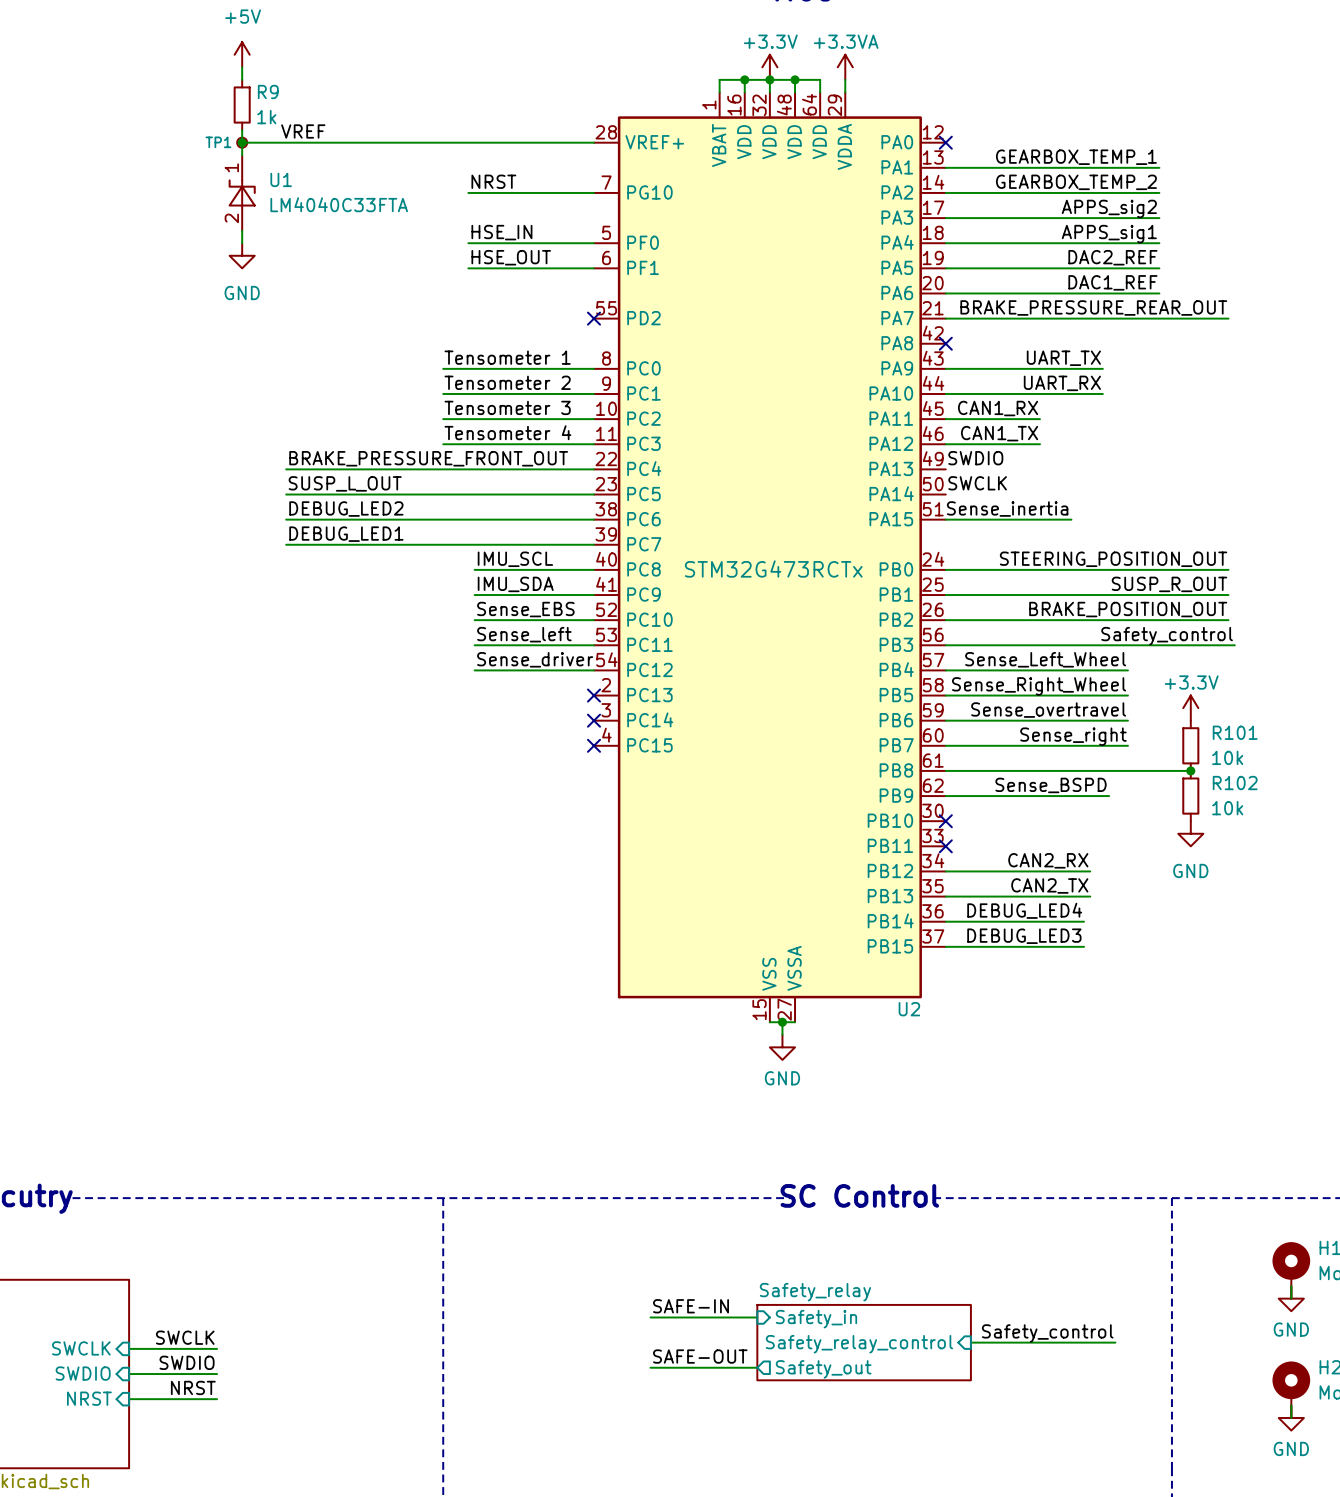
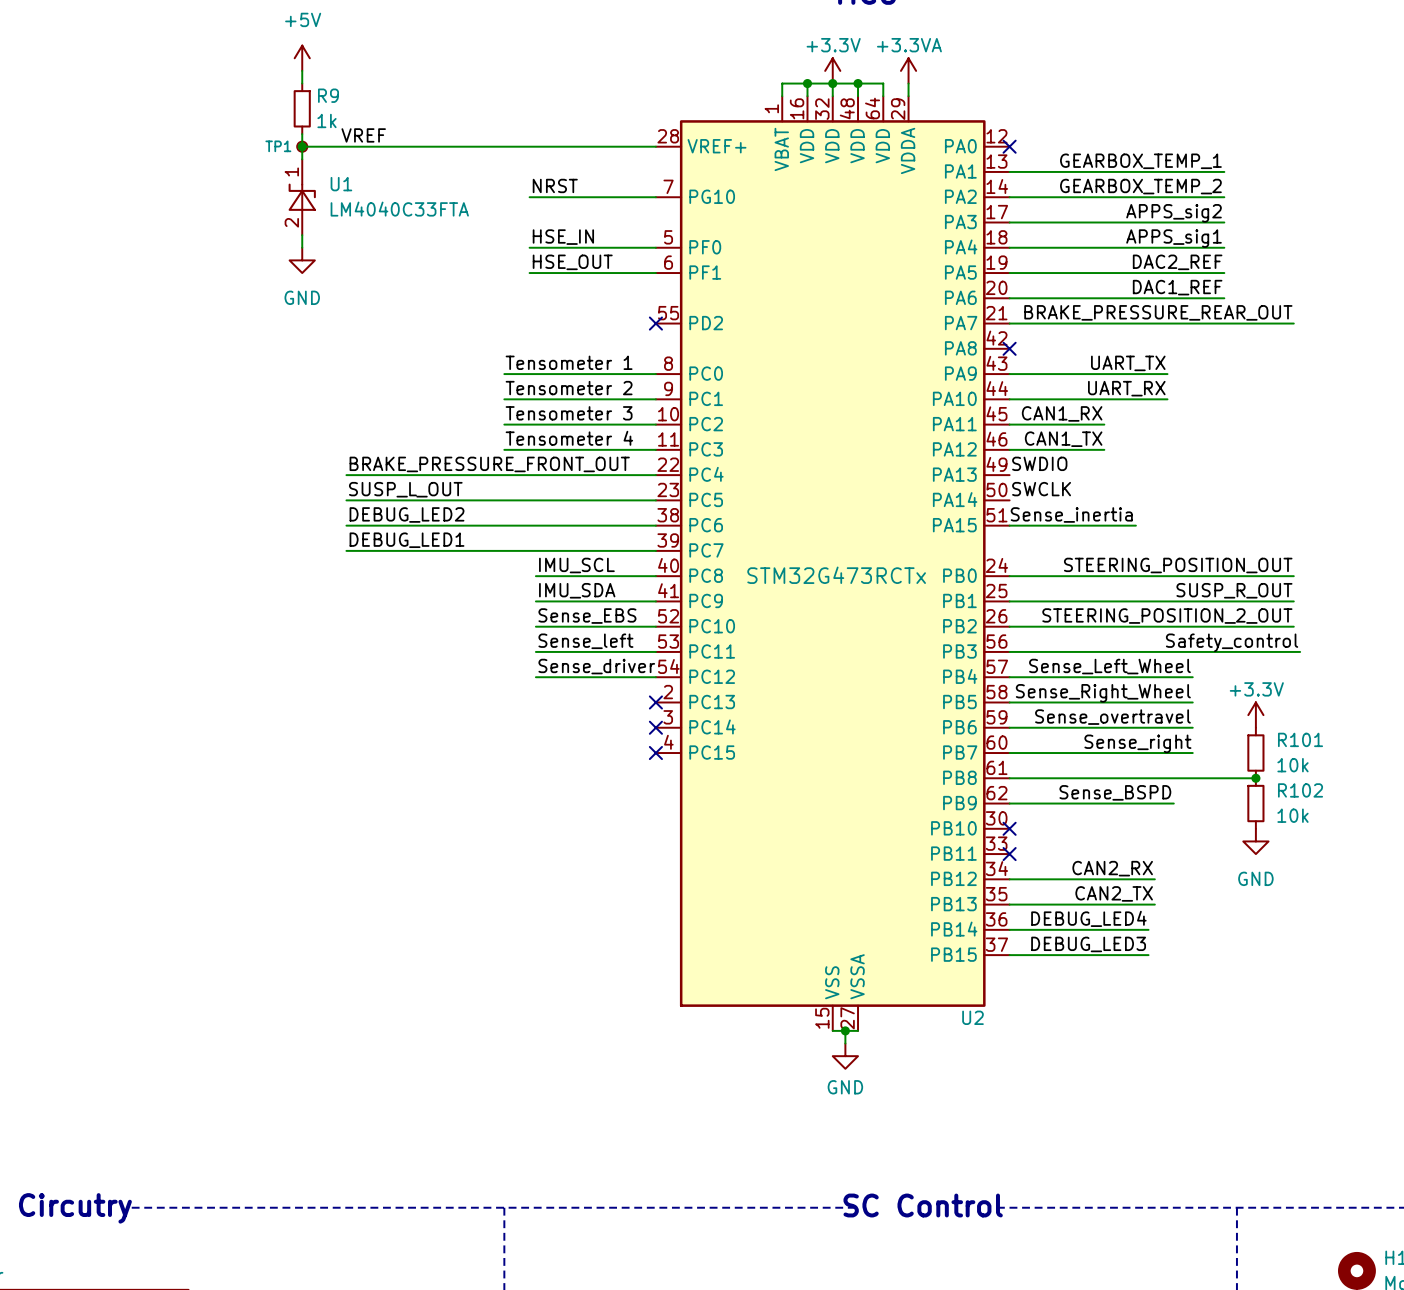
label: BRAKE_POSITION_OUT (1128, 609) -> STEERING_POSITION_2_OUT (1167, 616)

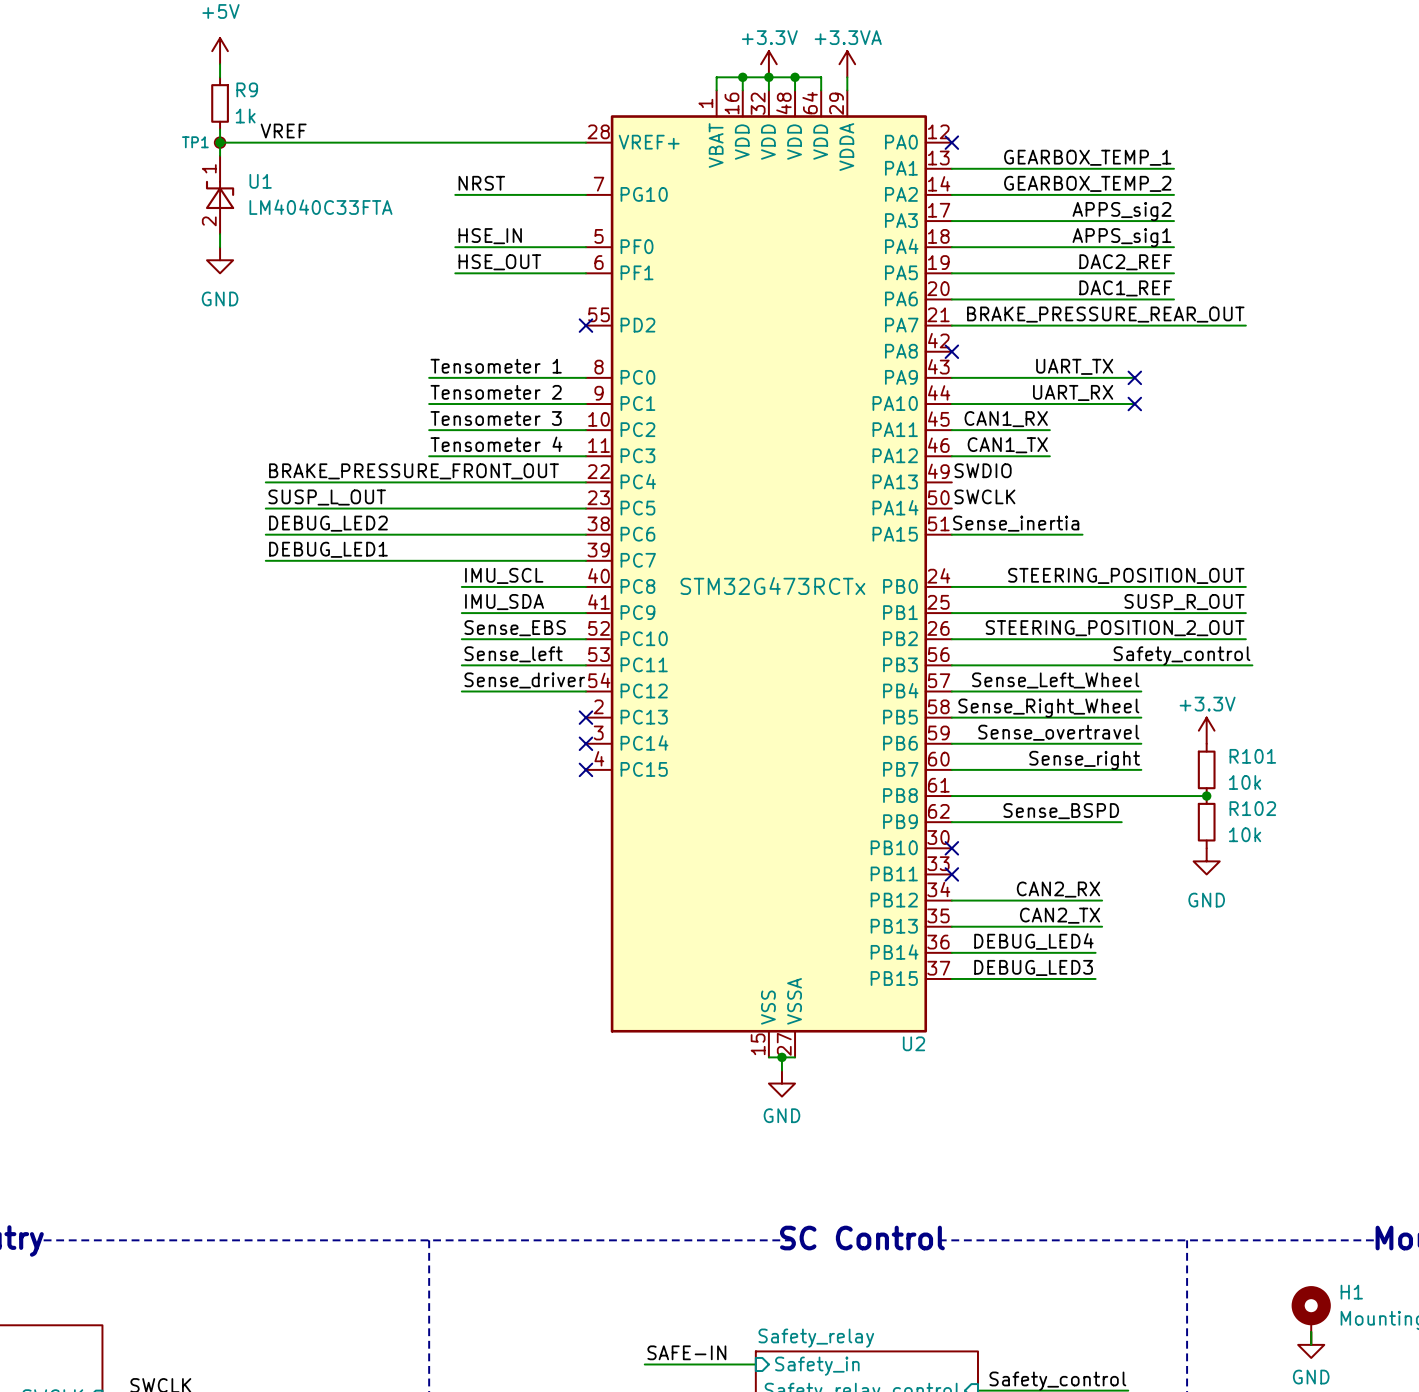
wire: none -> (1115, 377) (1134, 377)
no-connect mark: none -> (1134, 377)
wire: none -> (1115, 404) (1134, 404)
no-connect mark: none -> (1134, 404)

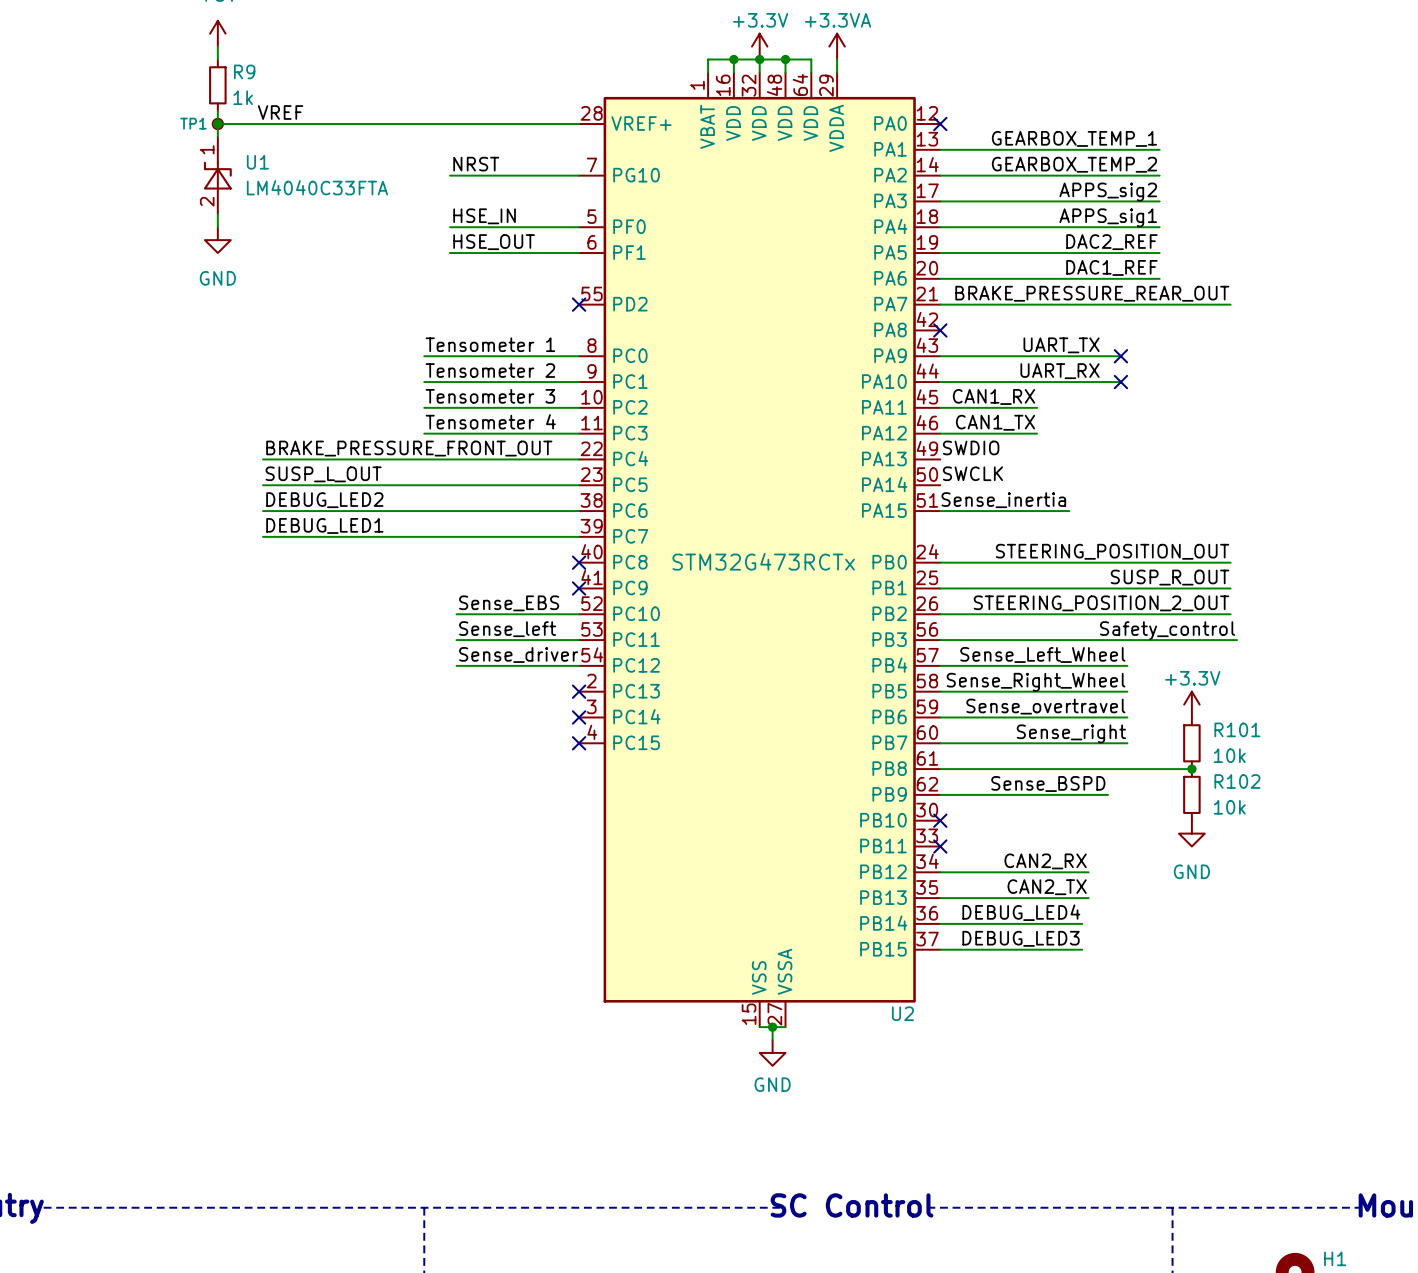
label: IMU_SCL (504, 575) -> none
wire: (461, 586) (585, 586) -> none
no-connect mark: none -> (579, 562)
label: IMU_SDA (504, 602) -> none
wire: (461, 613) (585, 613) -> none
no-connect mark: none -> (579, 588)

